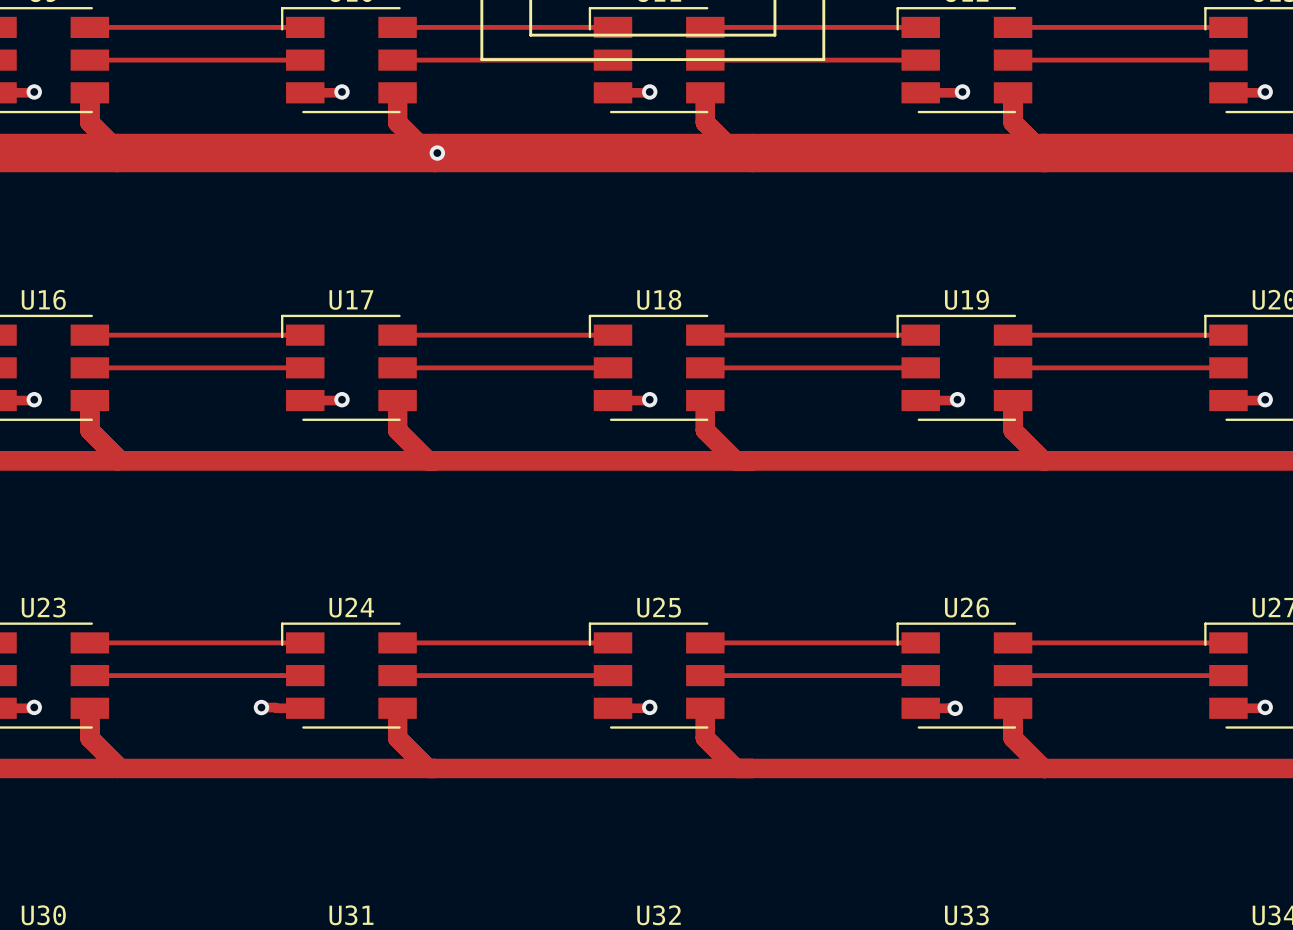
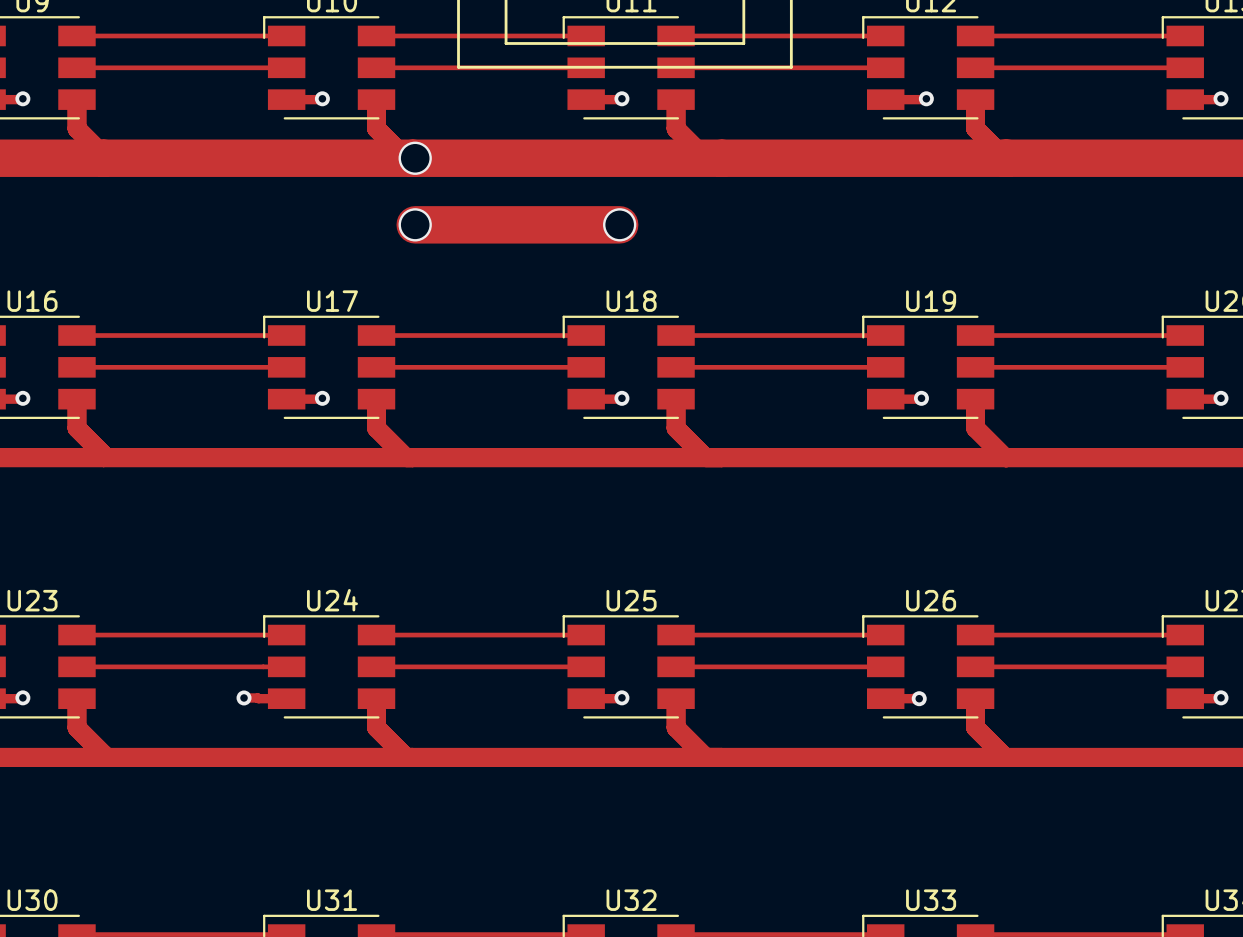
via size: [429, 145, 446, 161] -> [398, 141, 432, 175]
track: none -> (415, 224) (619, 224)
via: none -> (415, 224)
via: none -> (619, 224)

